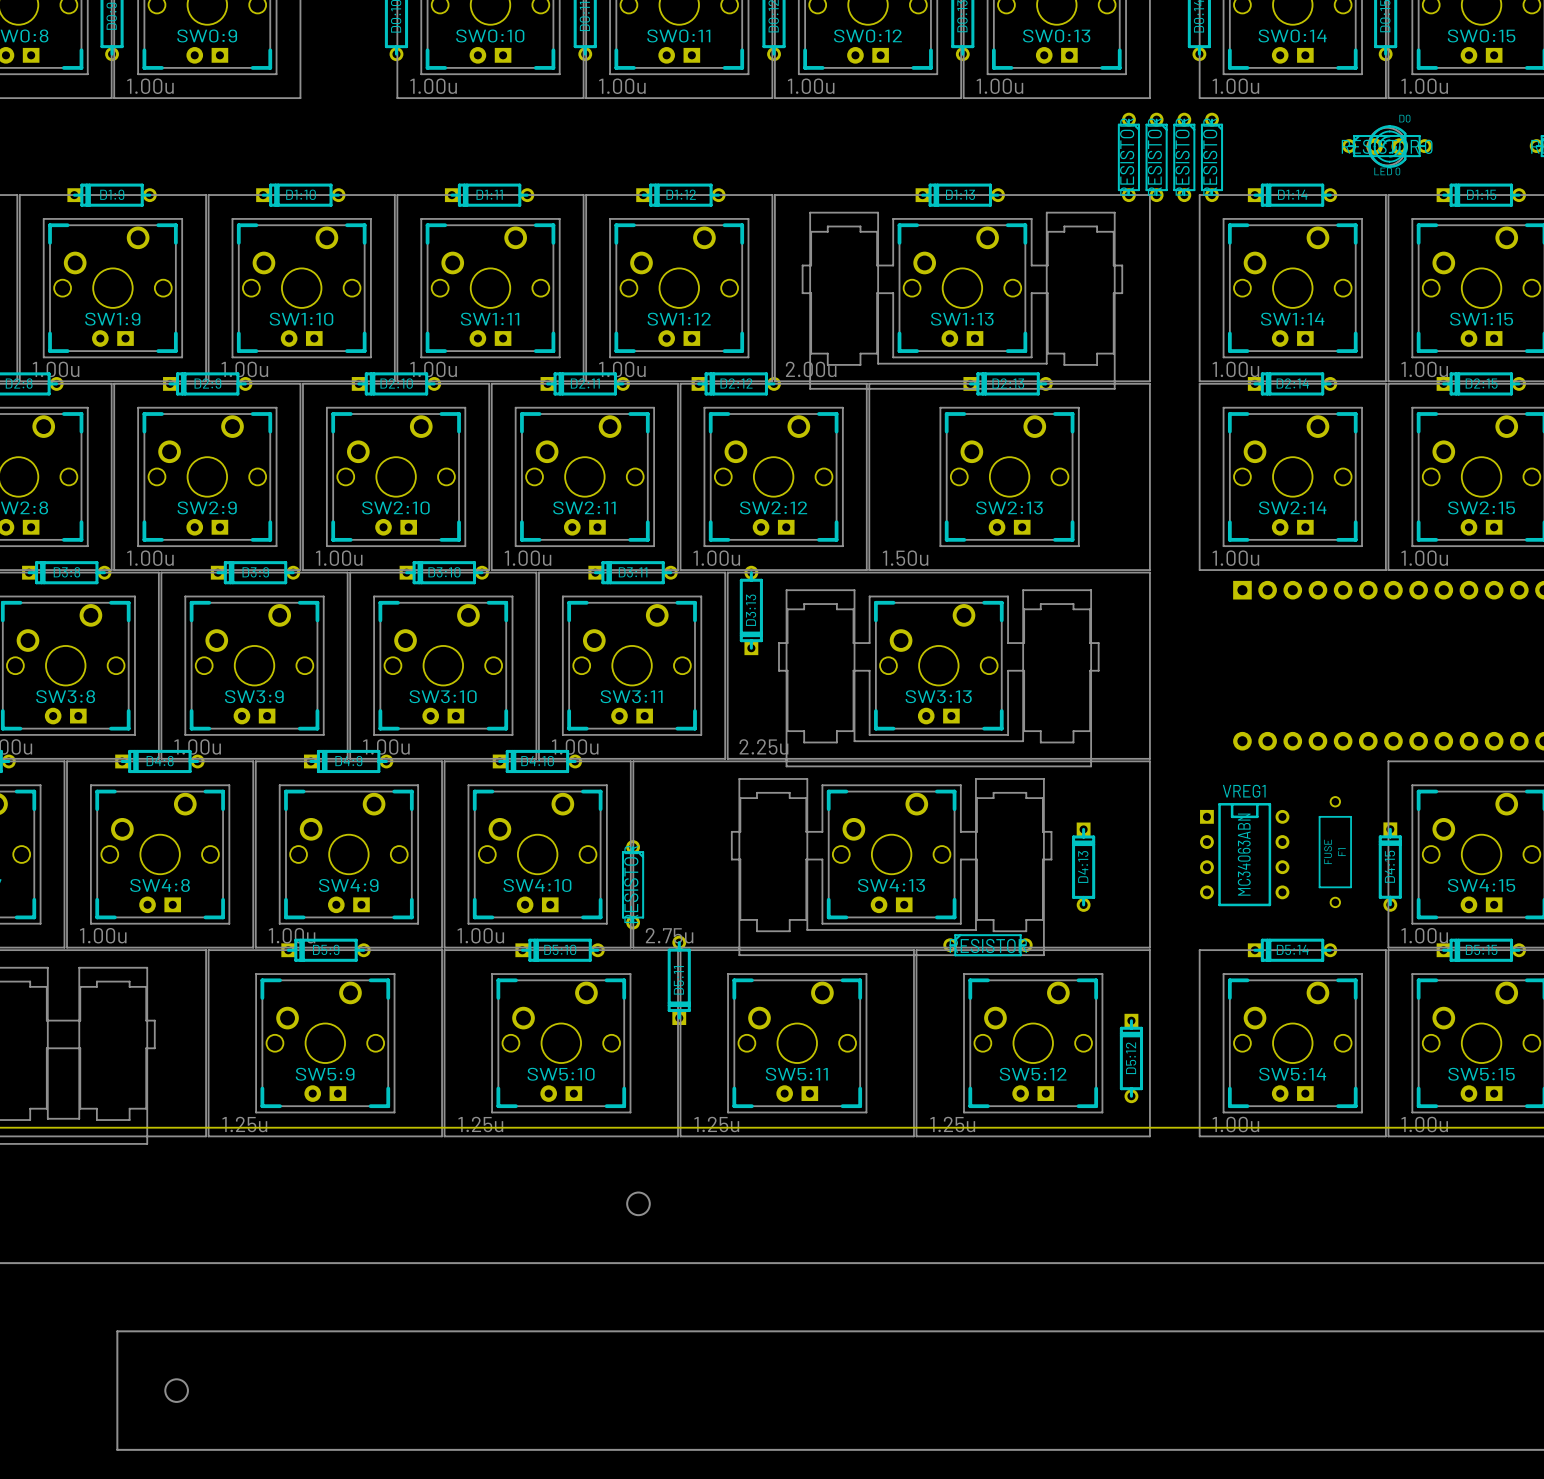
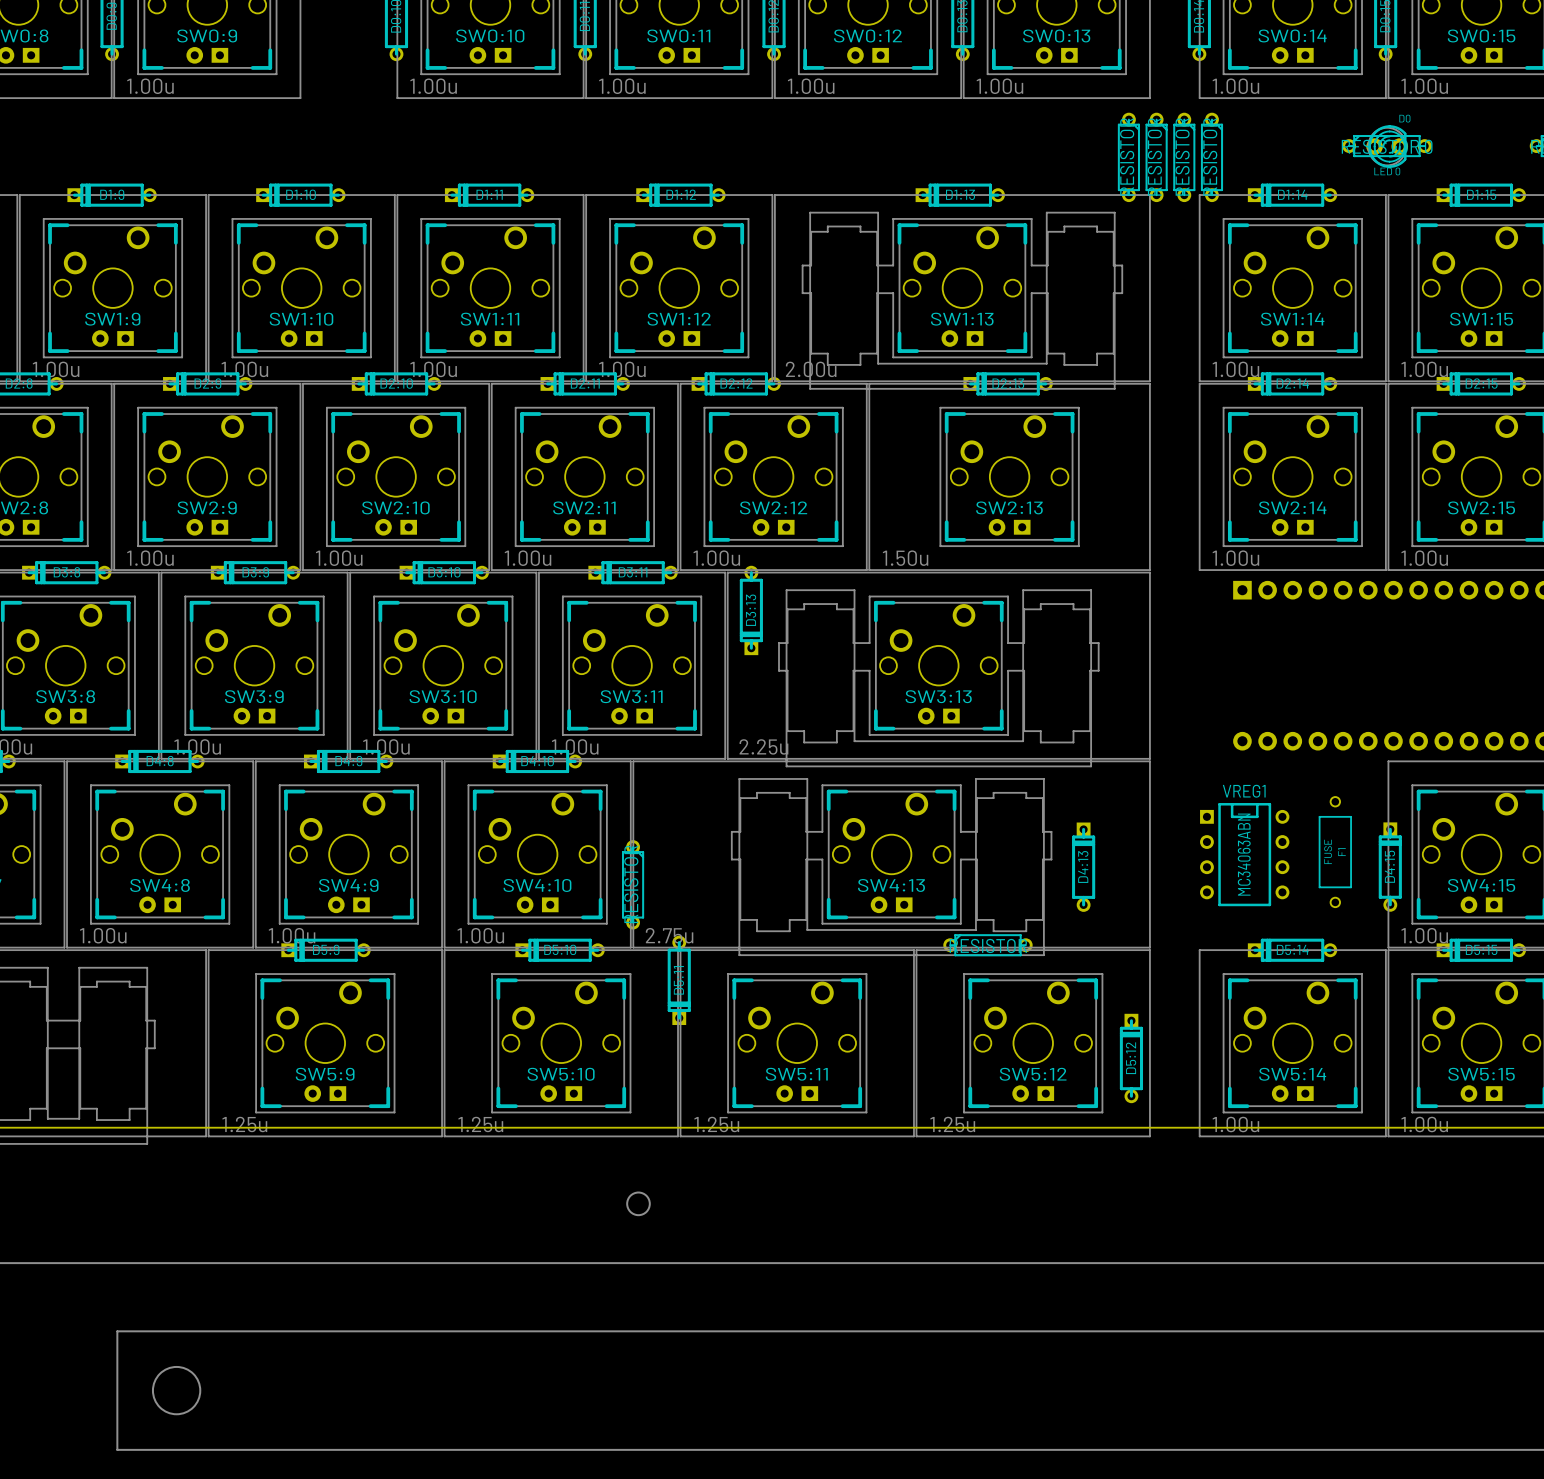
drawing shape: [164, 1378, 189, 1403] -> [151, 1365, 202, 1416]

